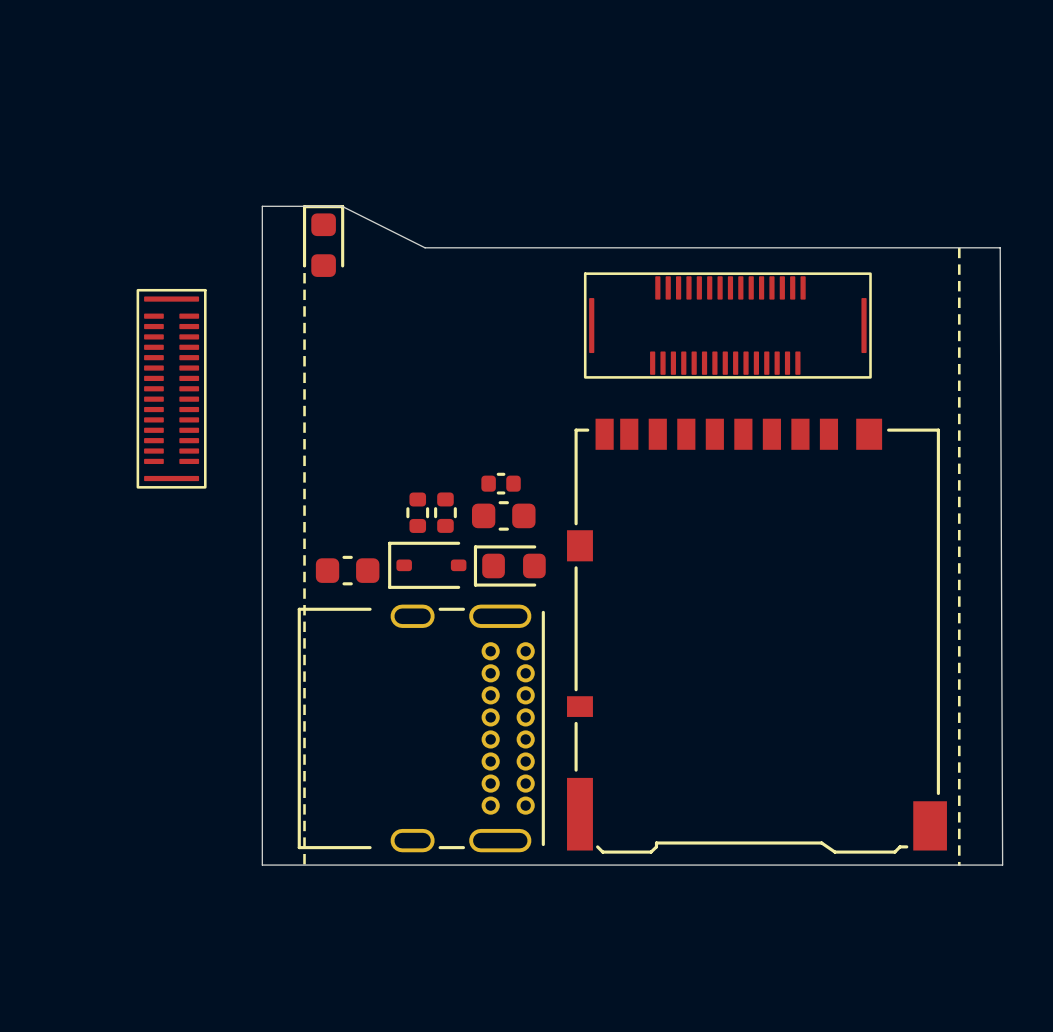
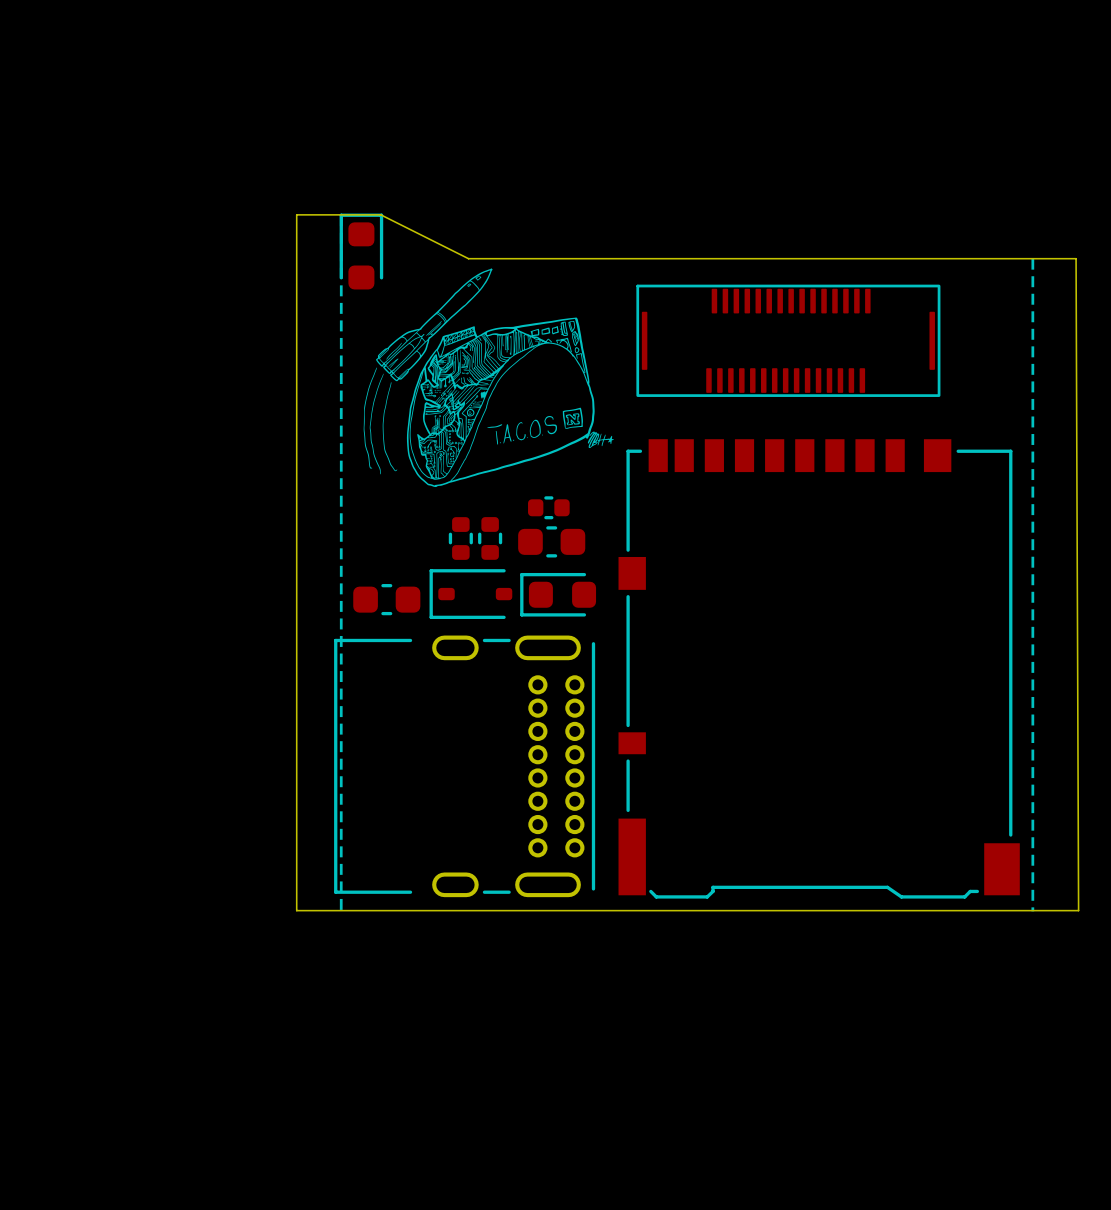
drawing: none -> [363, 268, 614, 488]
part: (171, 388) -> none

